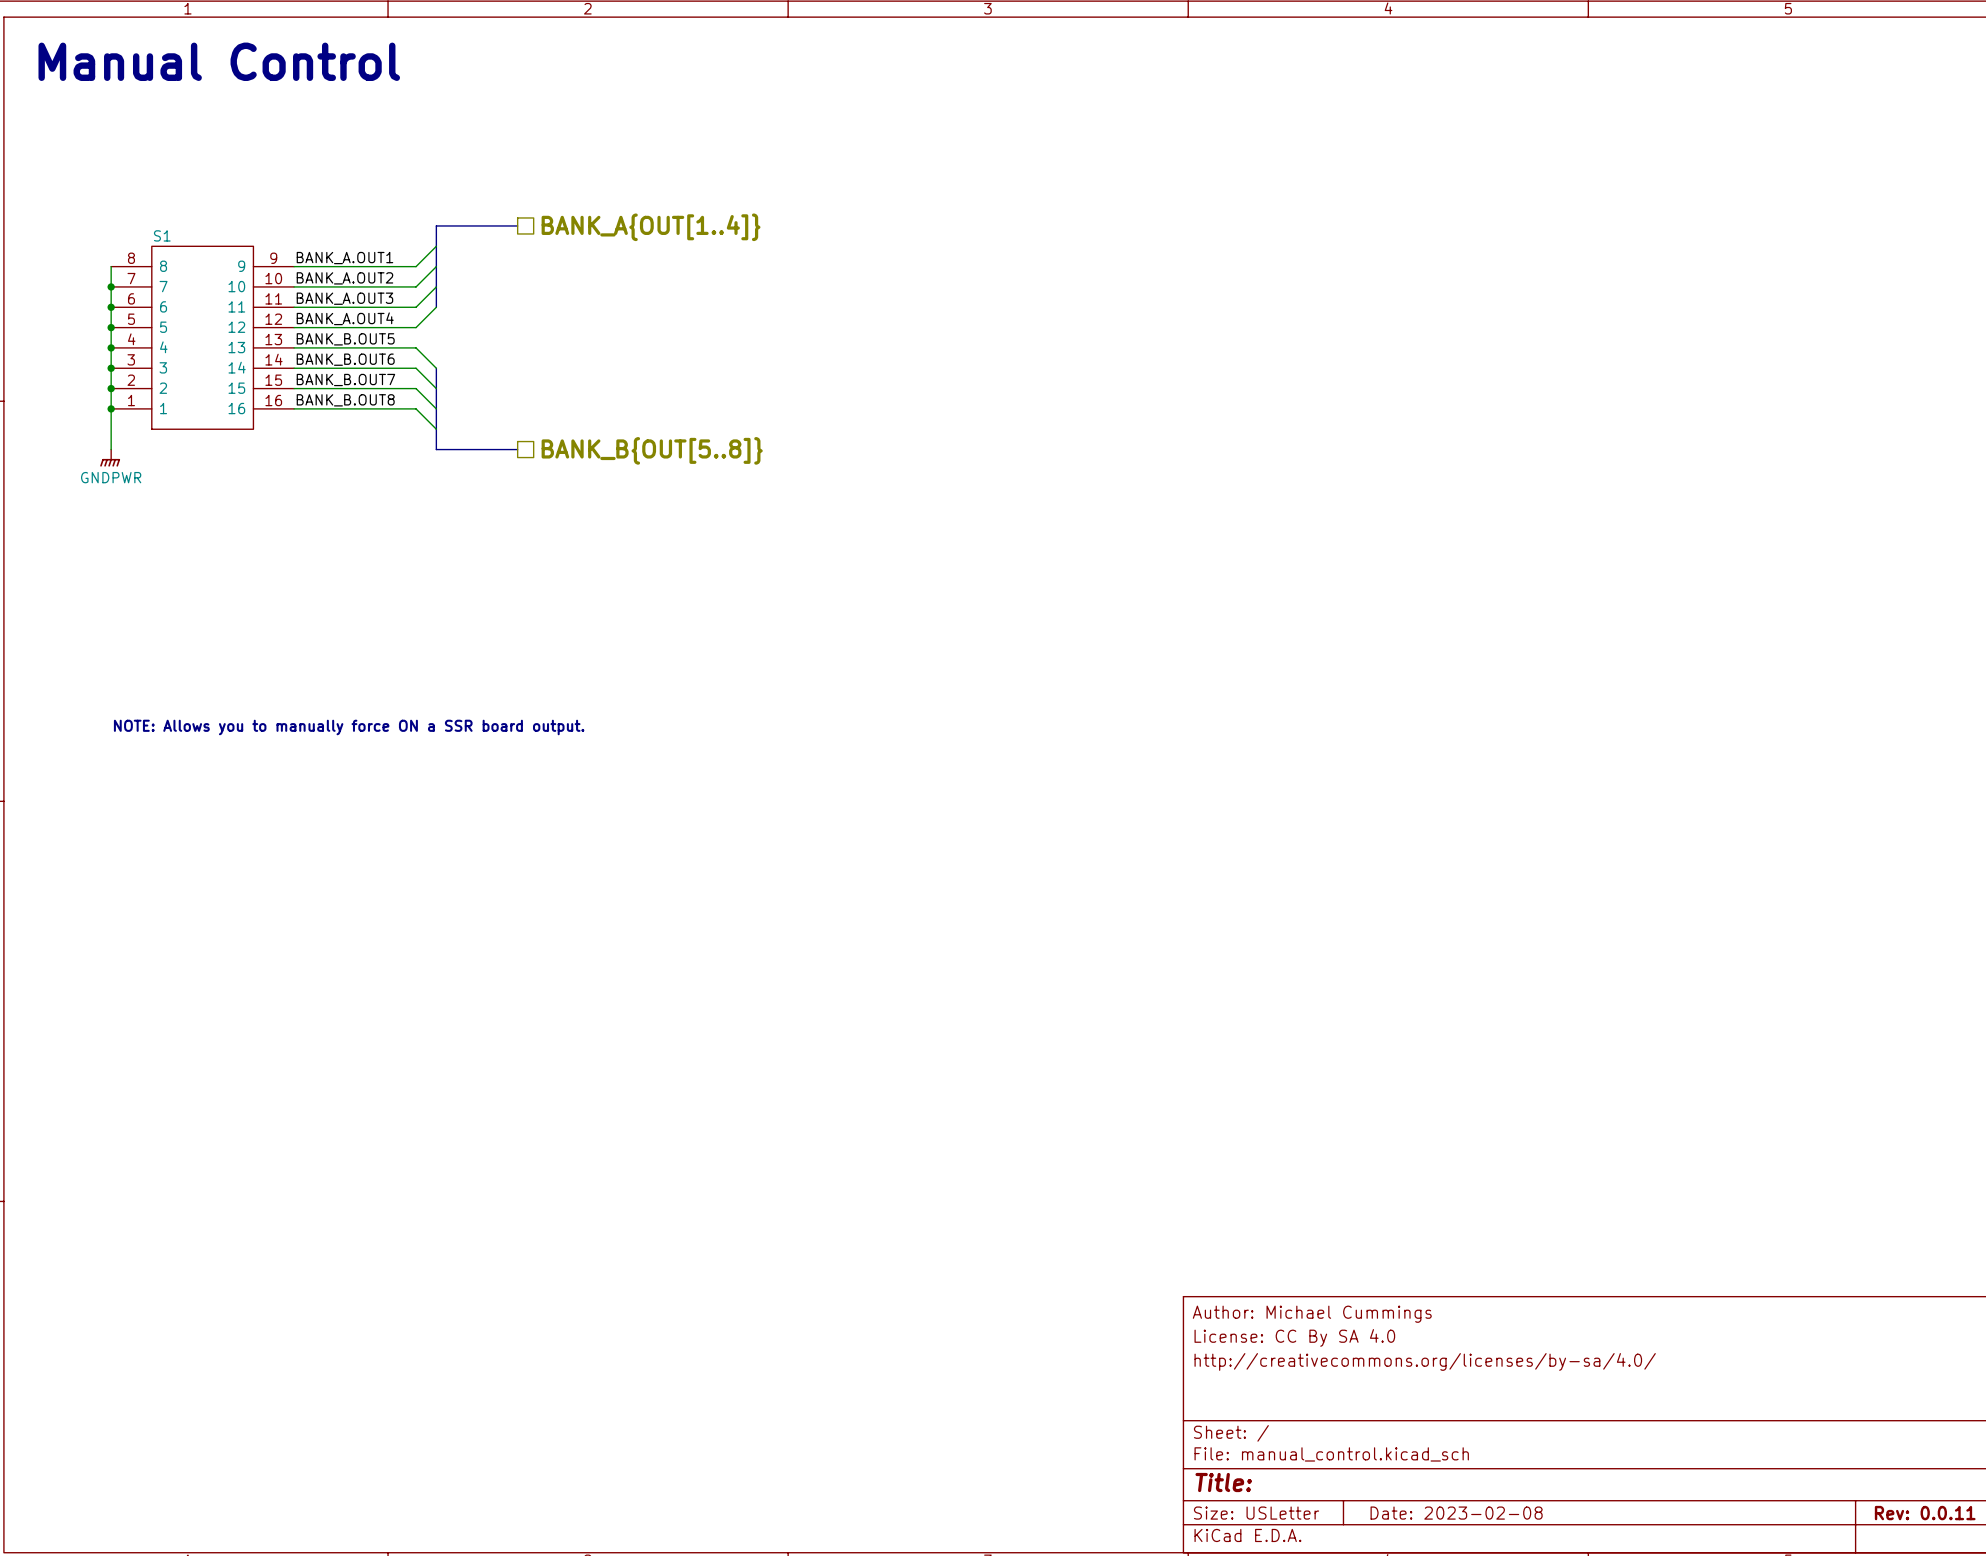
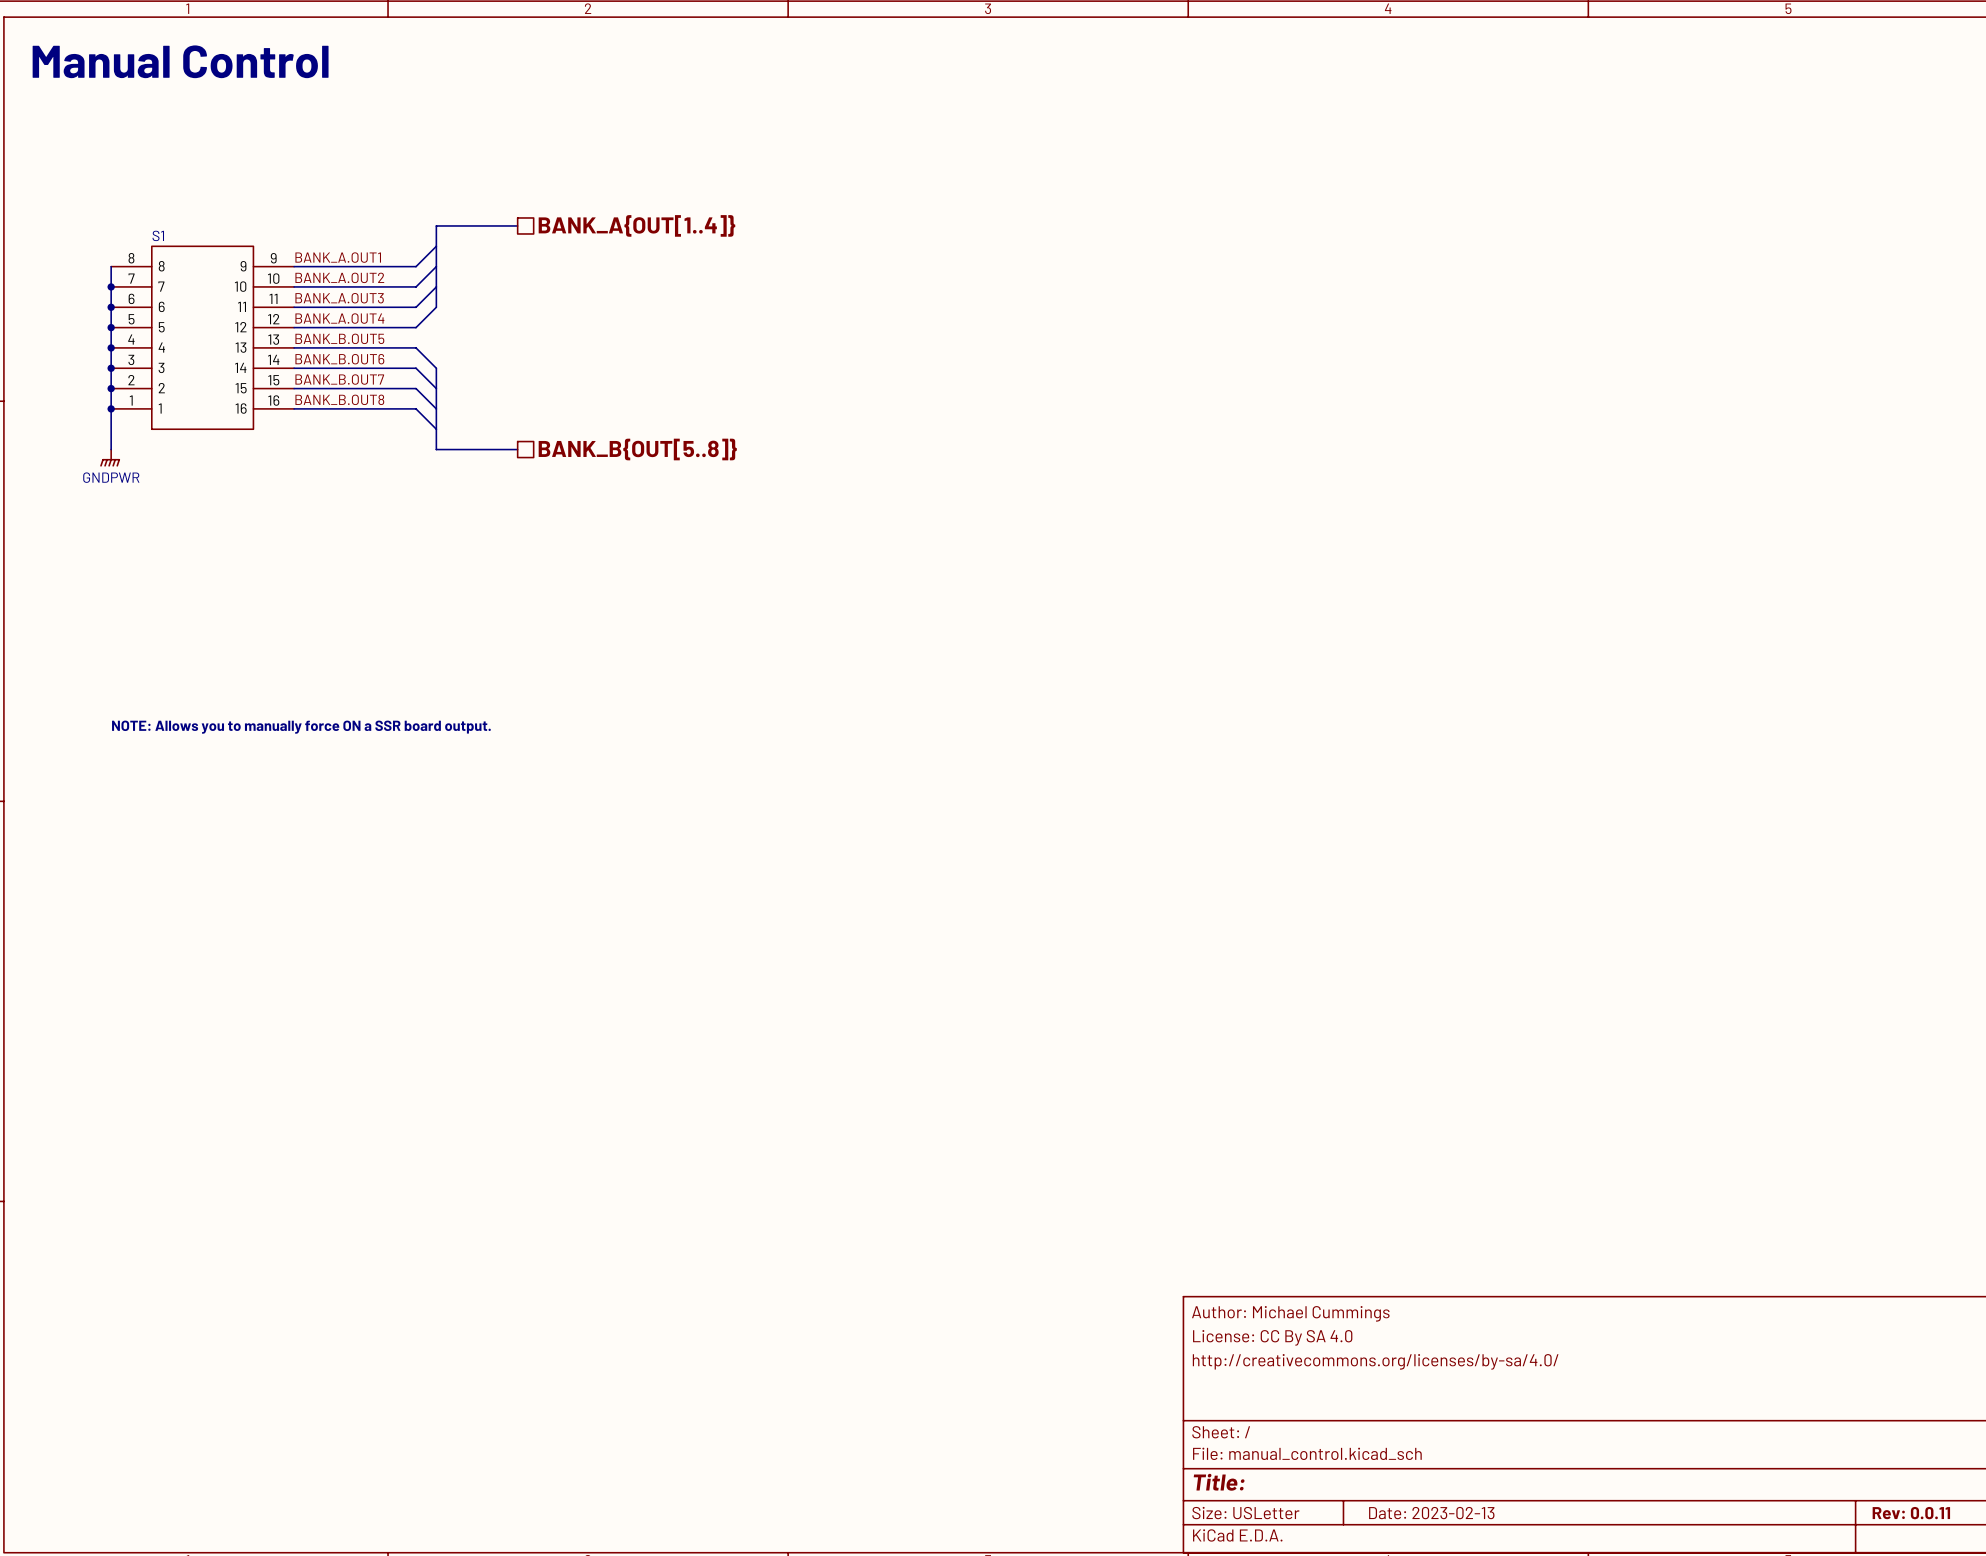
title block: Date: 2023-02-08 (1456, 1513) -> Date: 2023-02-13 (1431, 1513)

